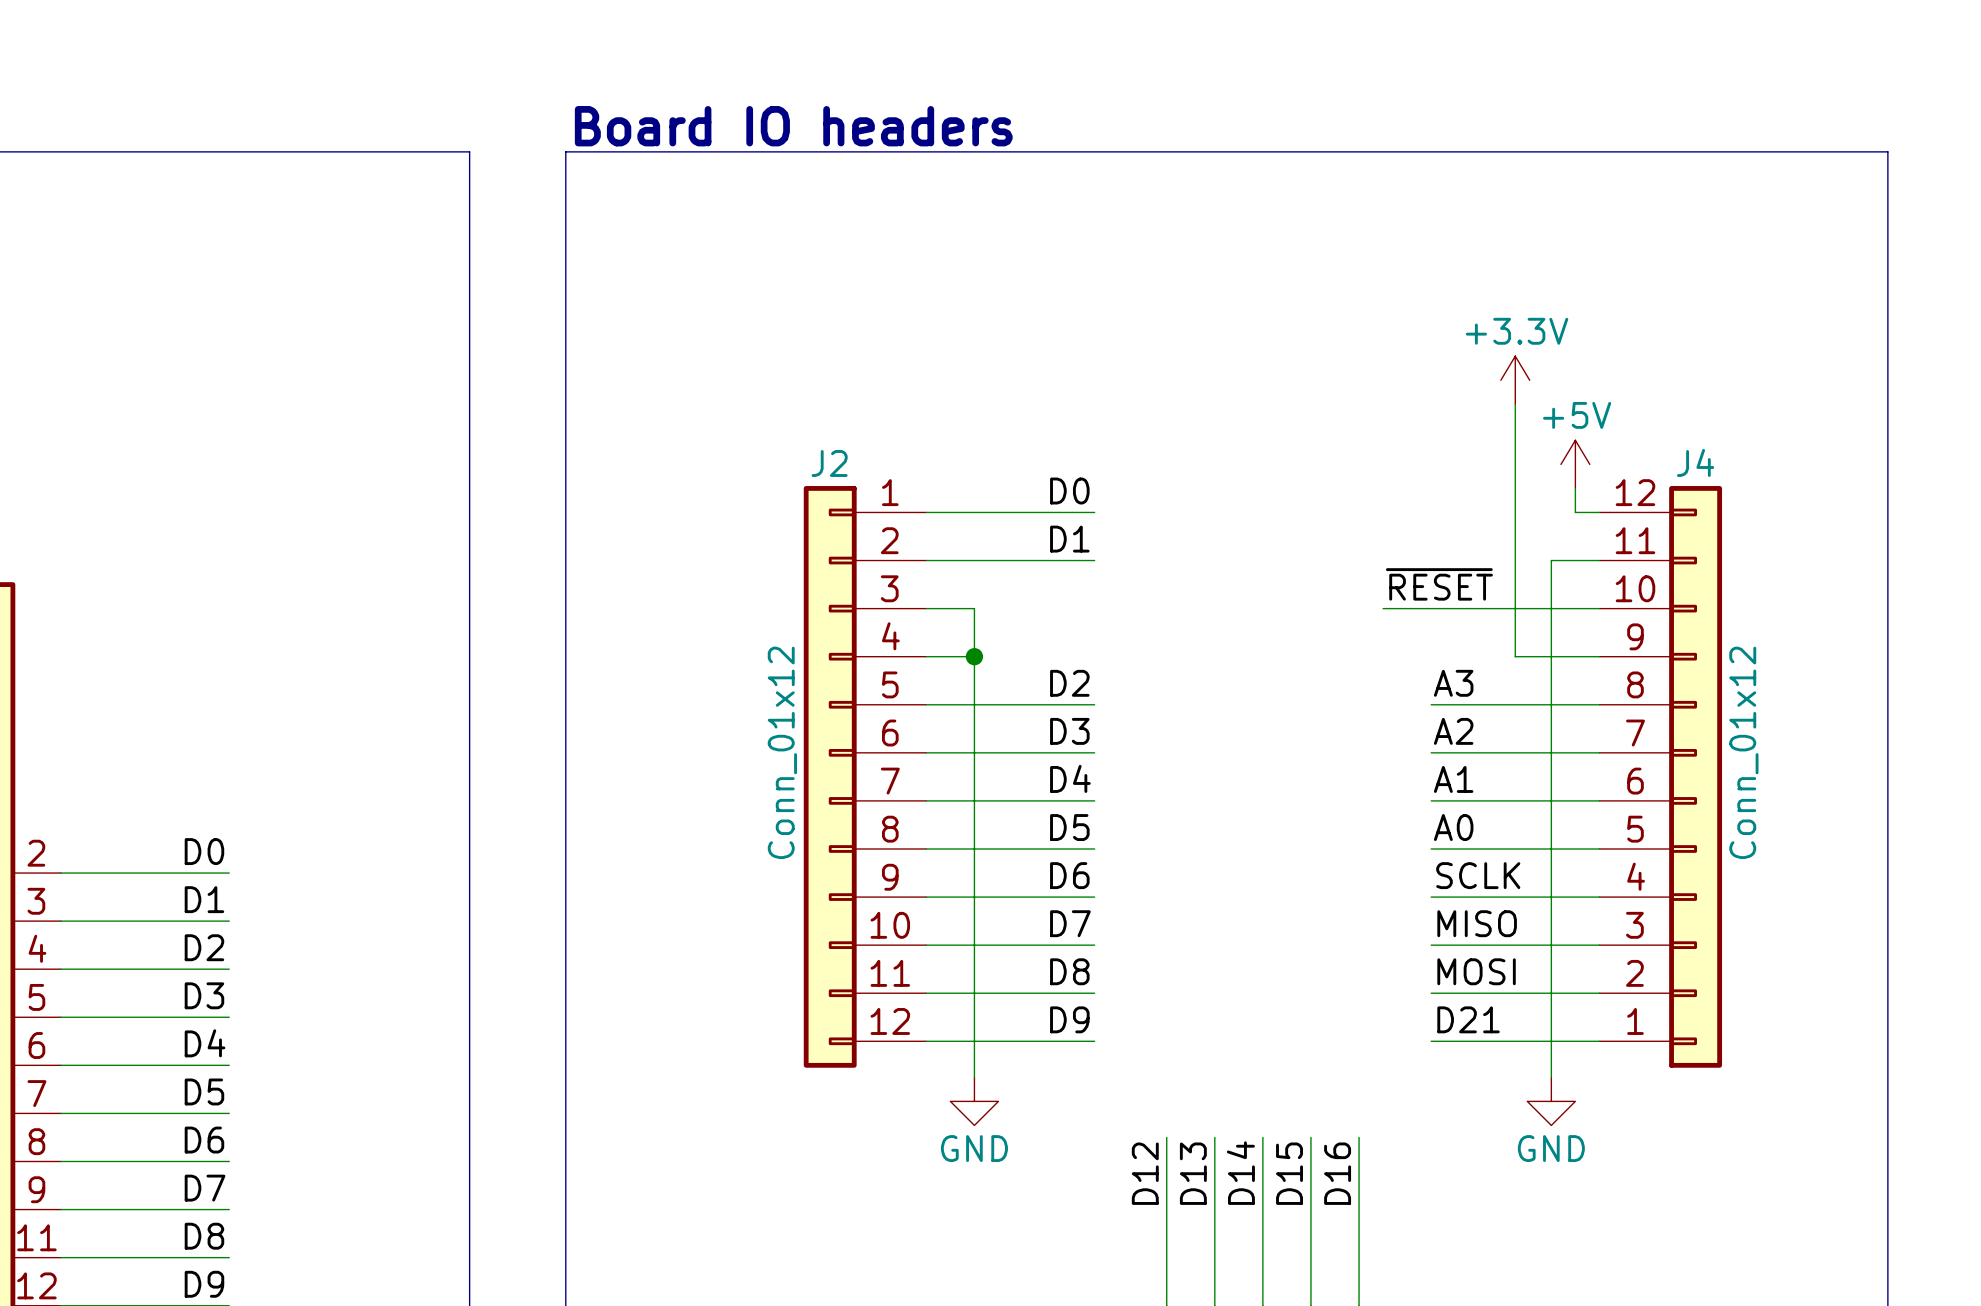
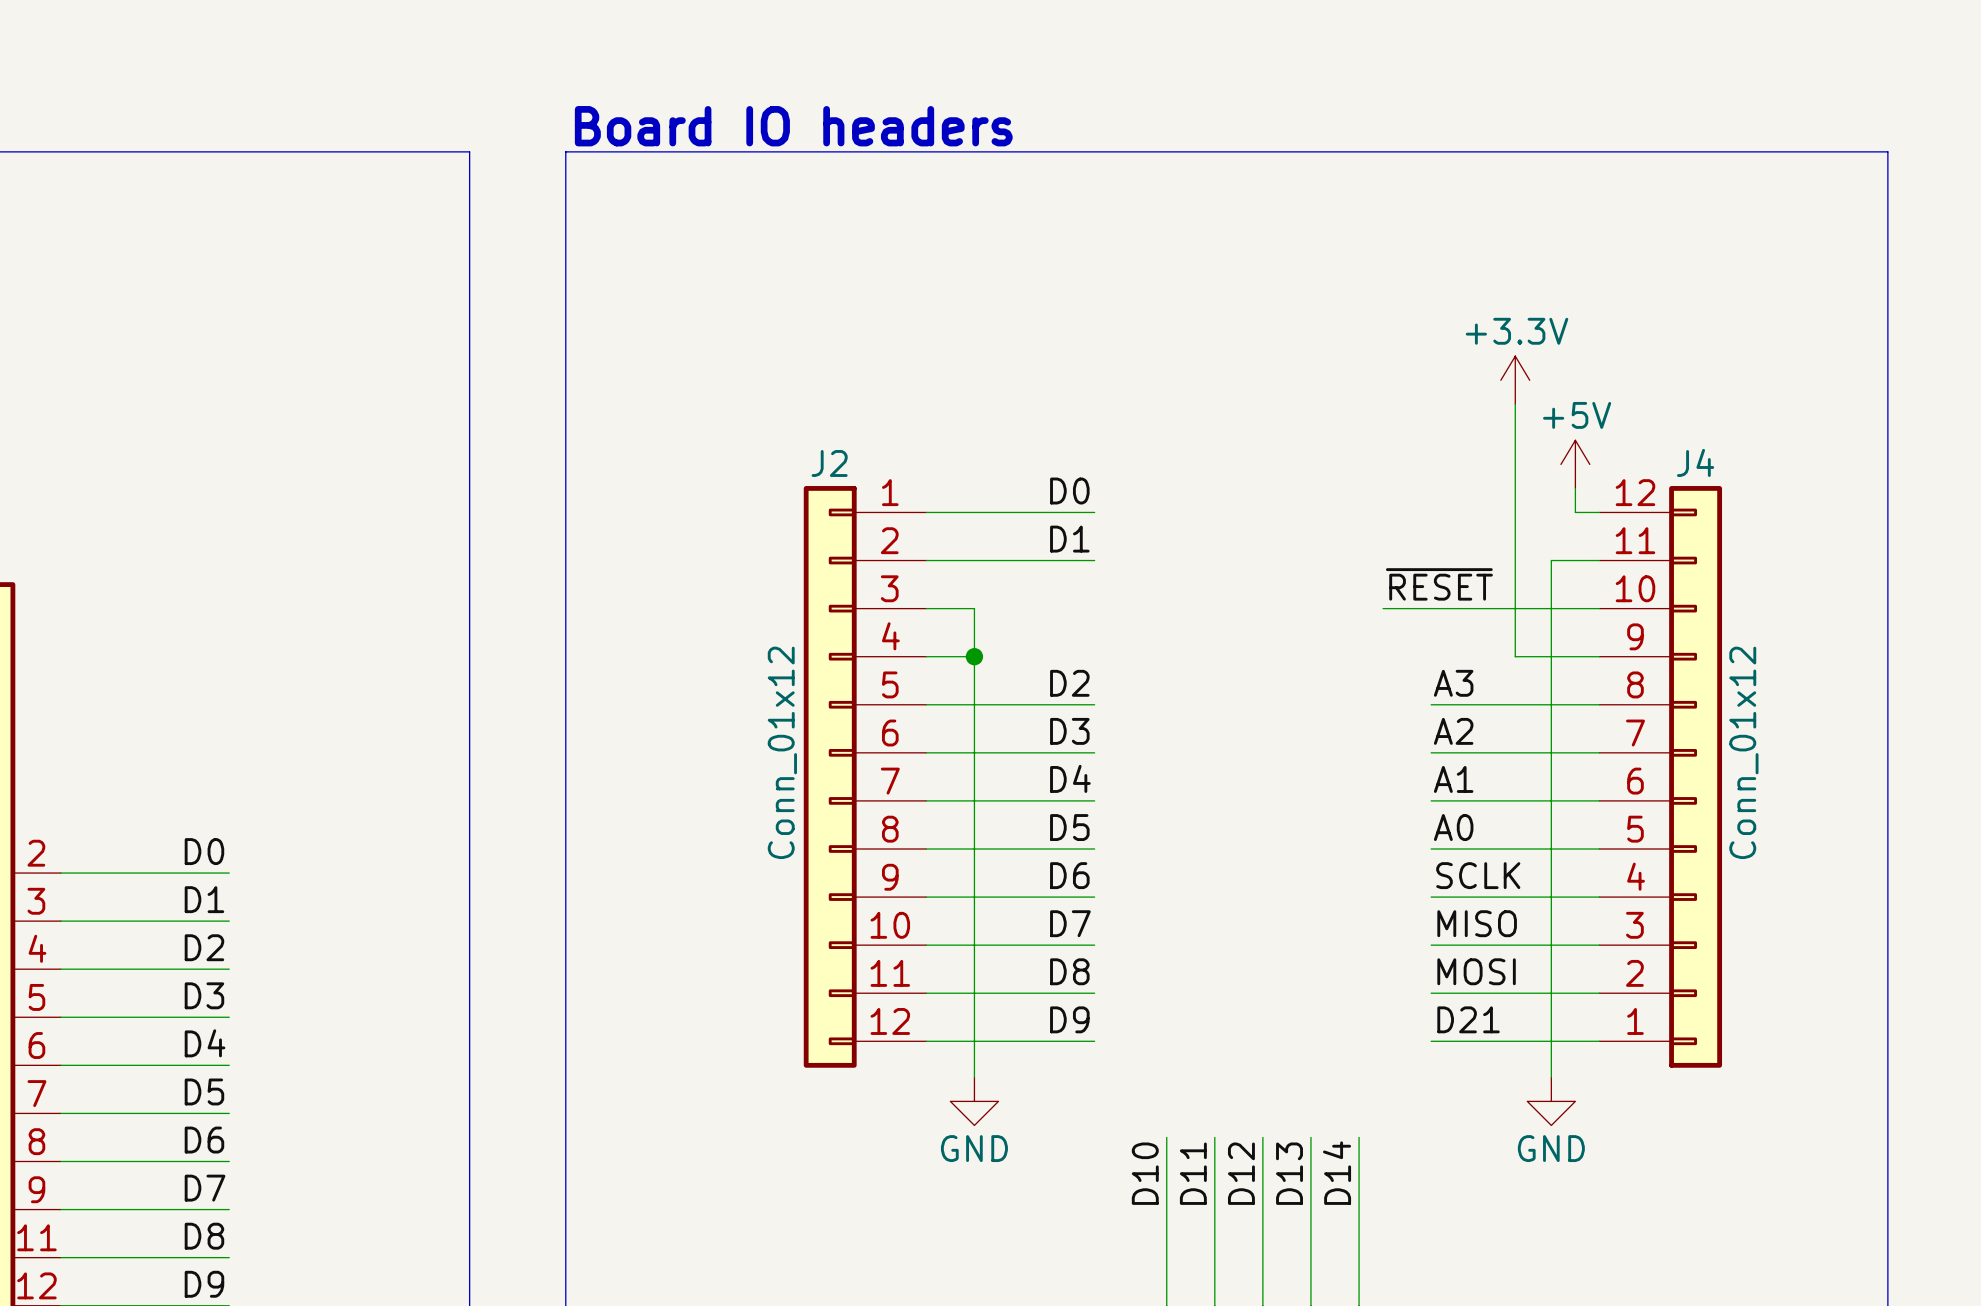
label: D12 (1145, 1173) -> D10 (1145, 1173)
label: D13 (1193, 1173) -> D11 (1193, 1173)
label: D14 (1240, 1173) -> D12 (1241, 1173)
label: D15 (1289, 1173) -> D13 (1289, 1173)
label: D16 (1337, 1173) -> D14 (1337, 1173)

